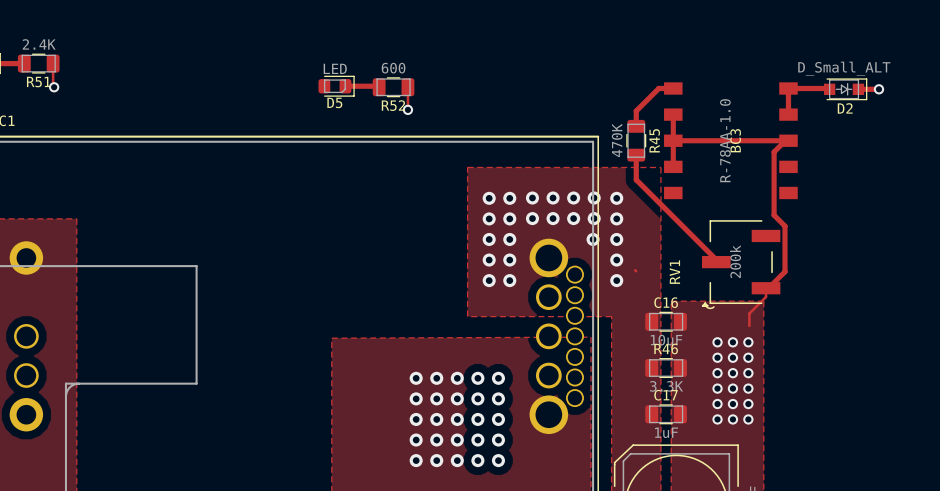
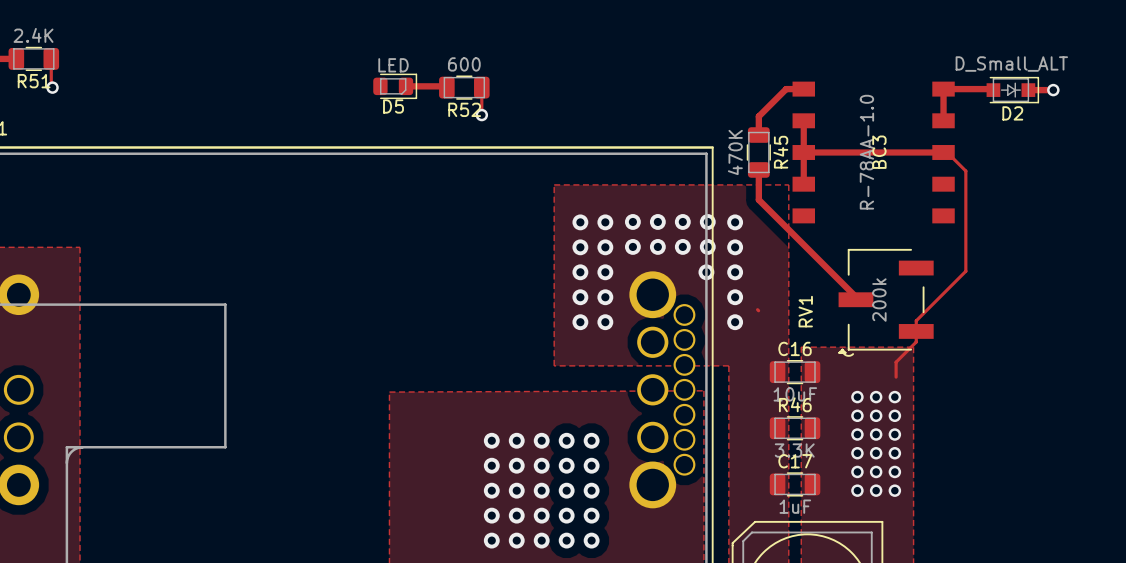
top track: (785, 140) (774, 152) (774, 215) (784, 226) (784, 271) (767, 288) -> none
top track: none -> (943, 152) (947, 152) (965, 171) (965, 271) (916, 320) (916, 331)

